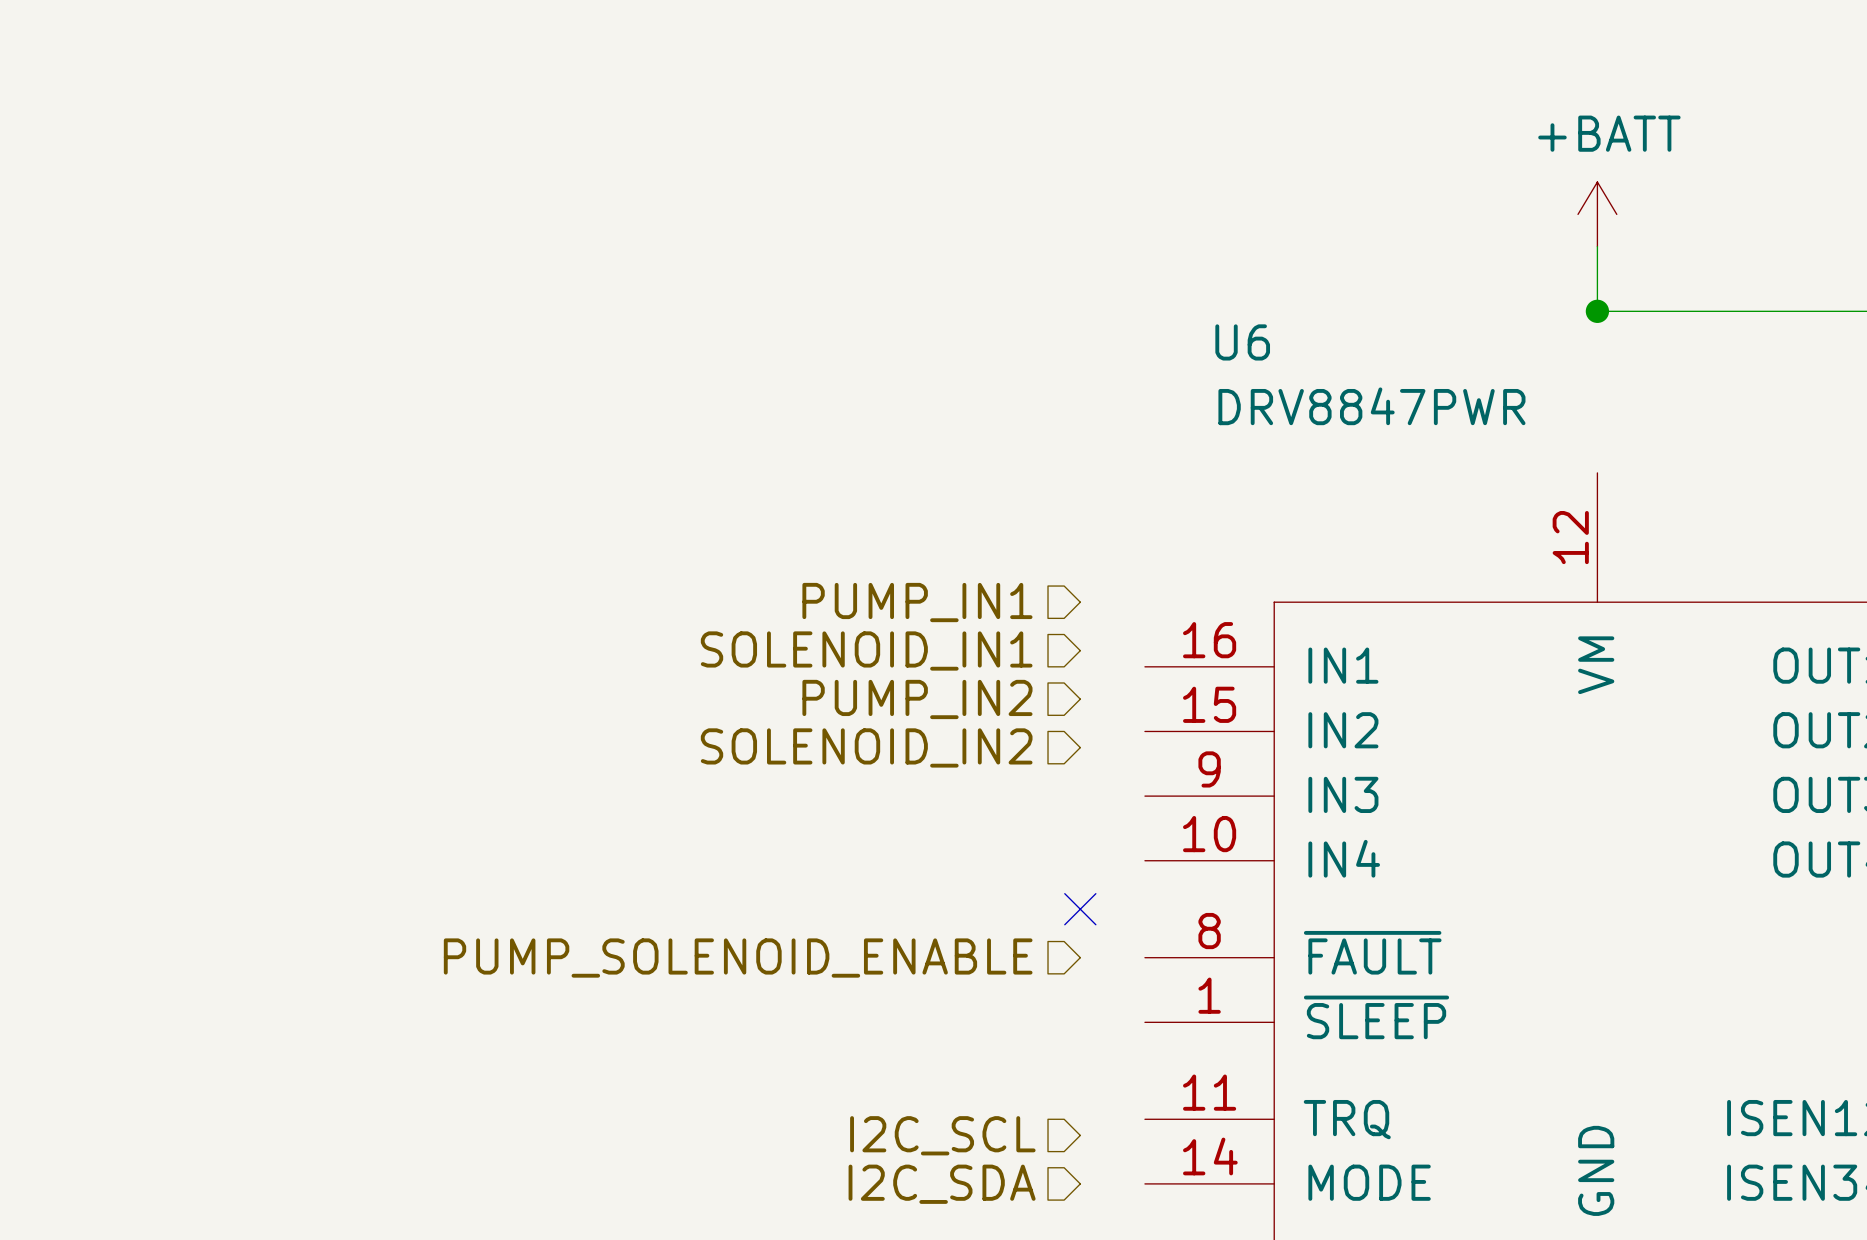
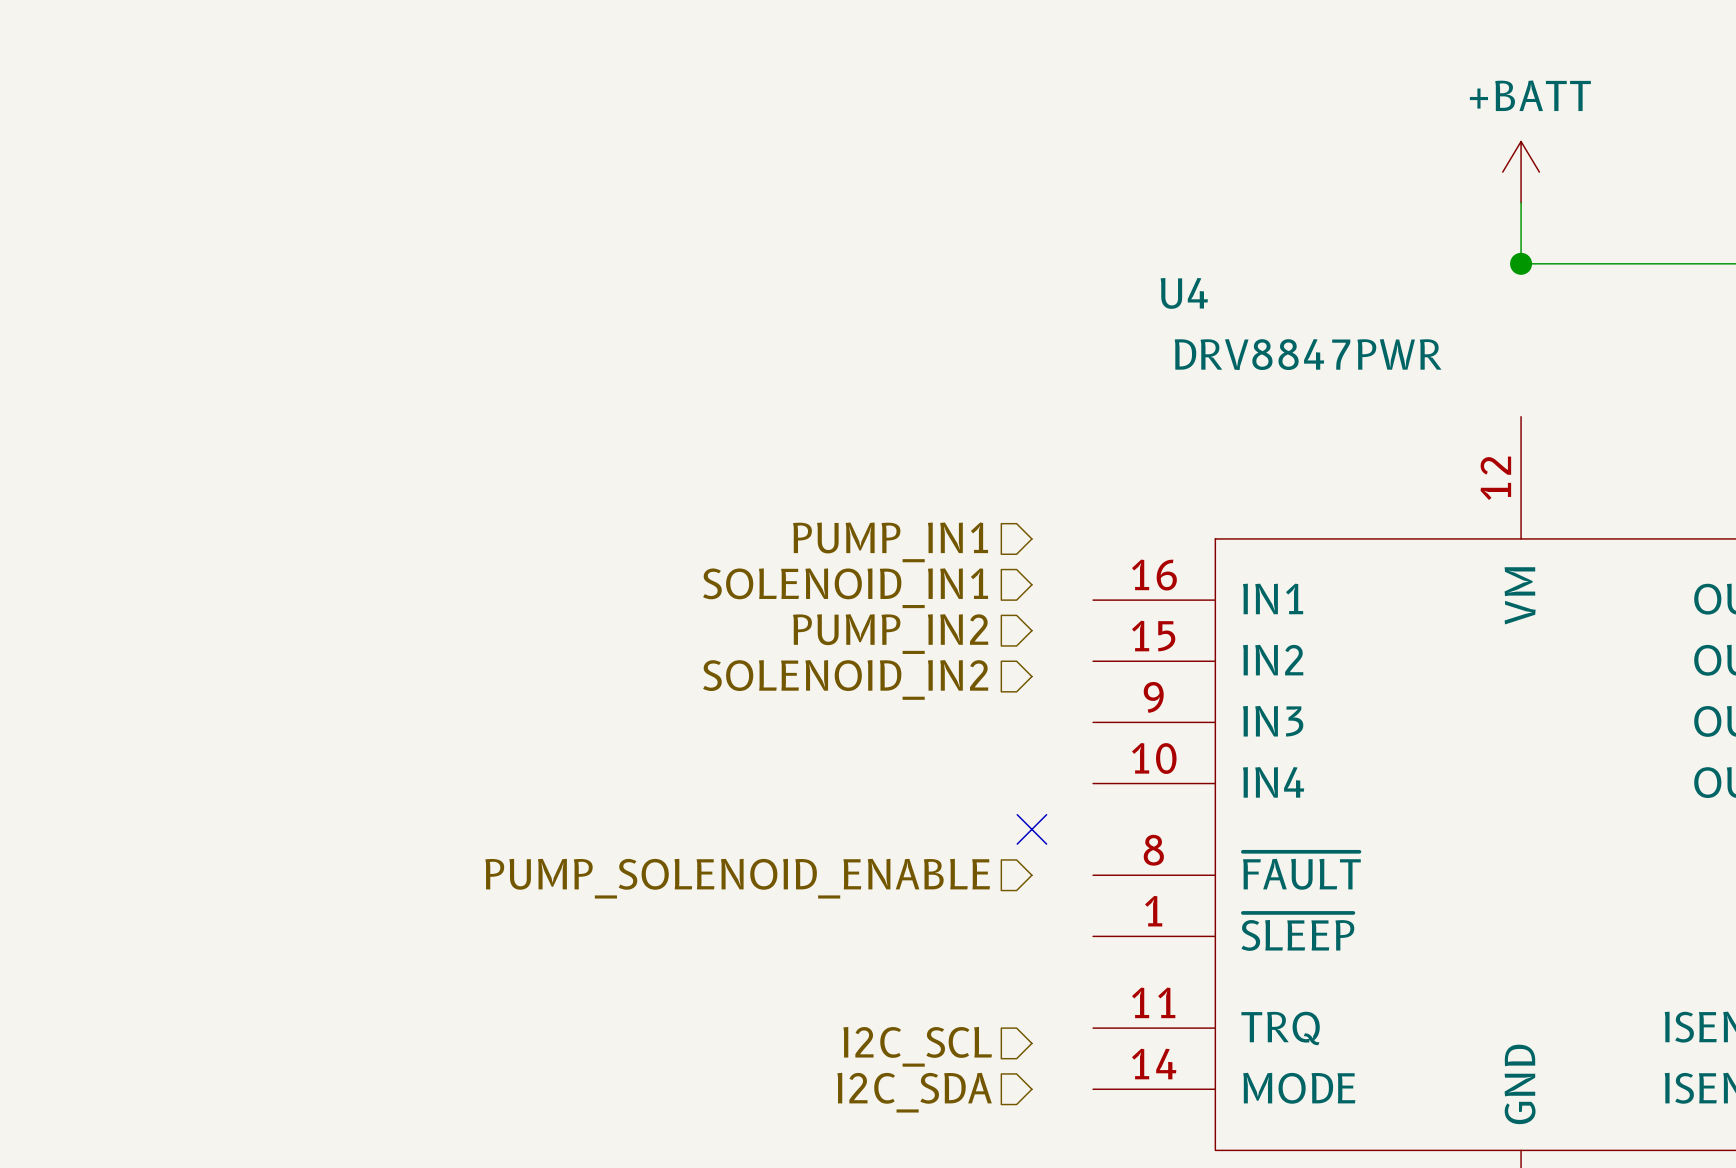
U6 name: U6 (1242, 342) -> U4 (1184, 293)

